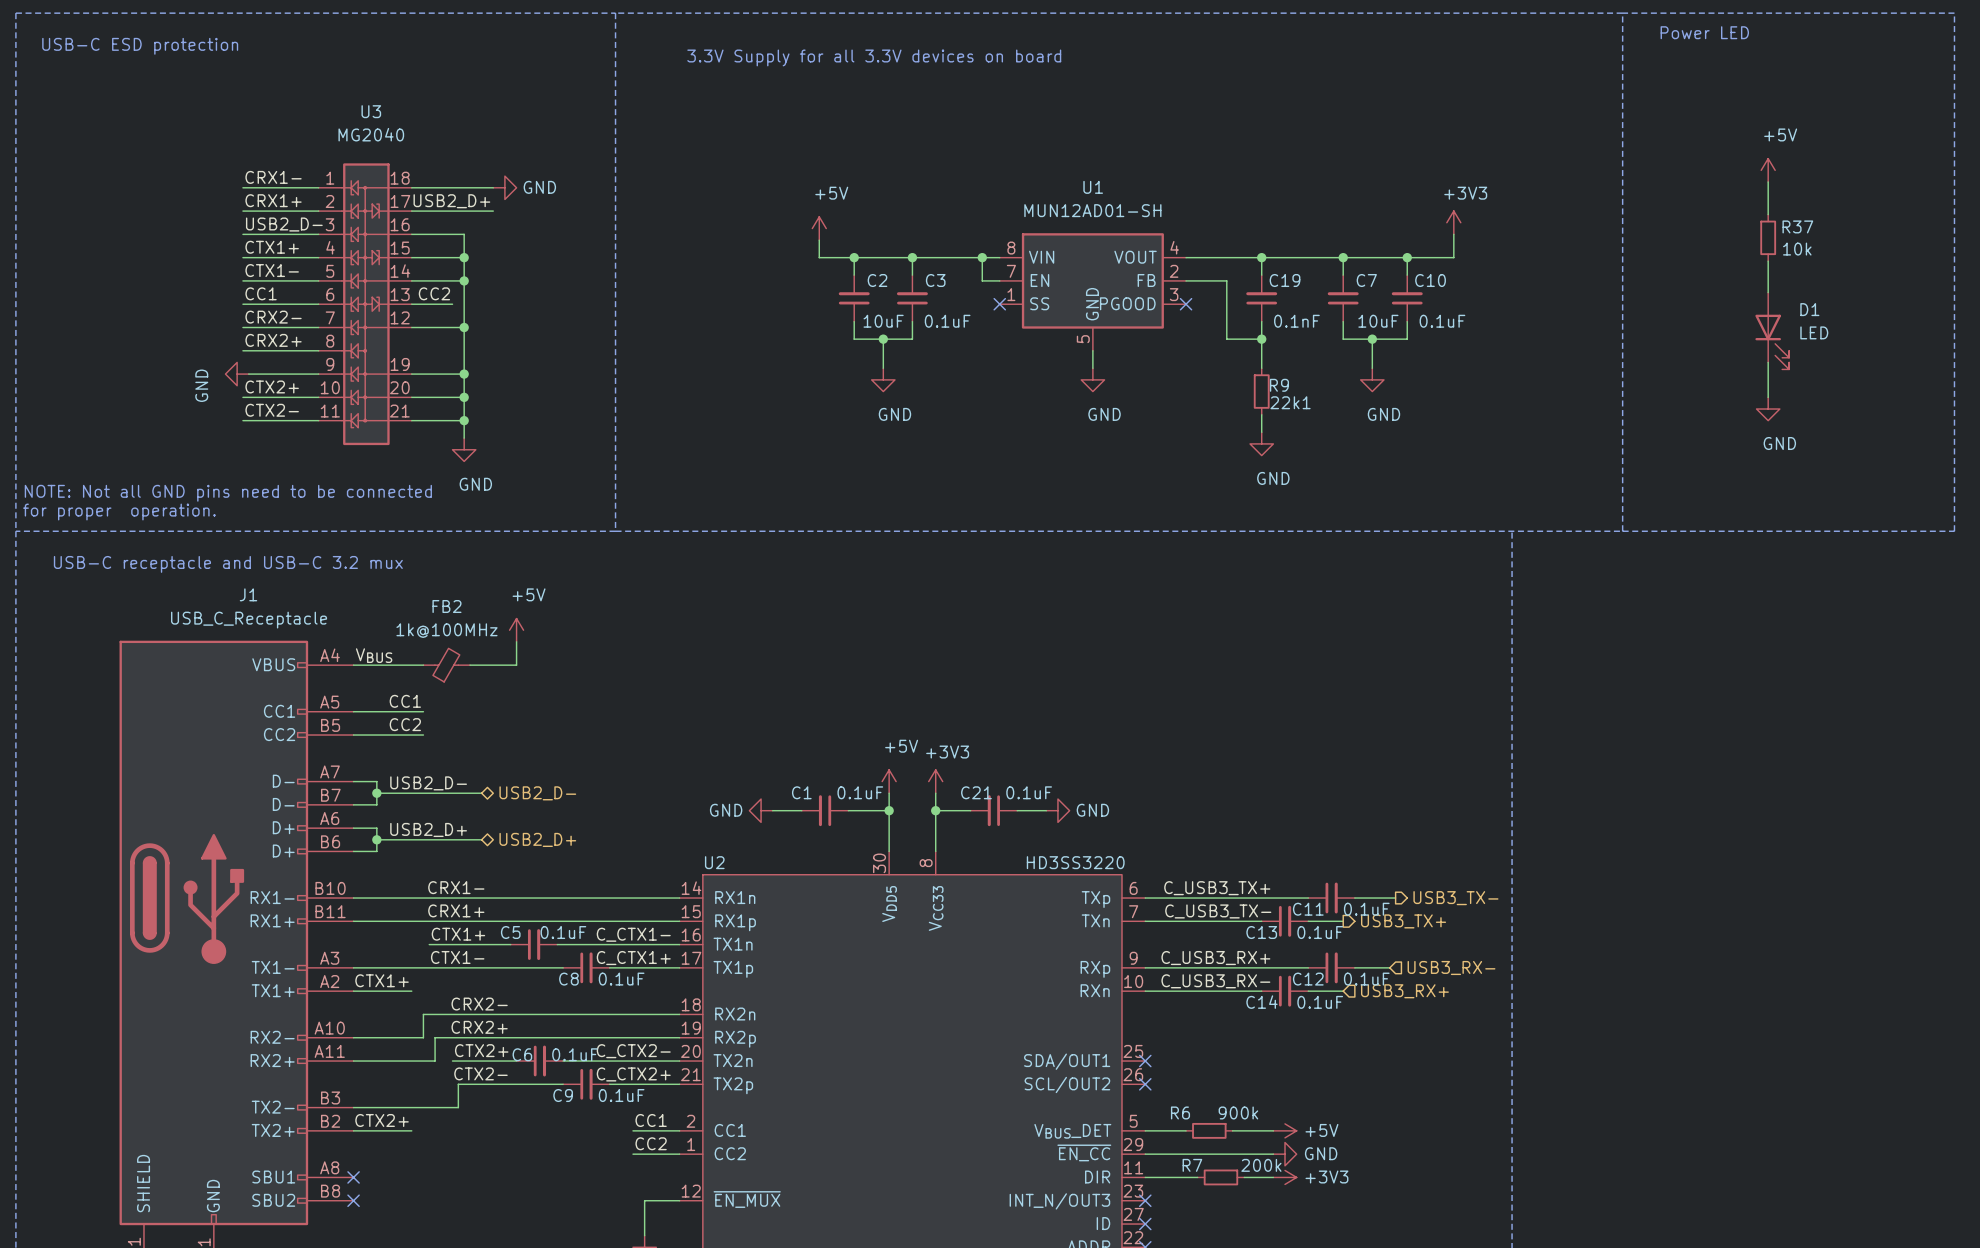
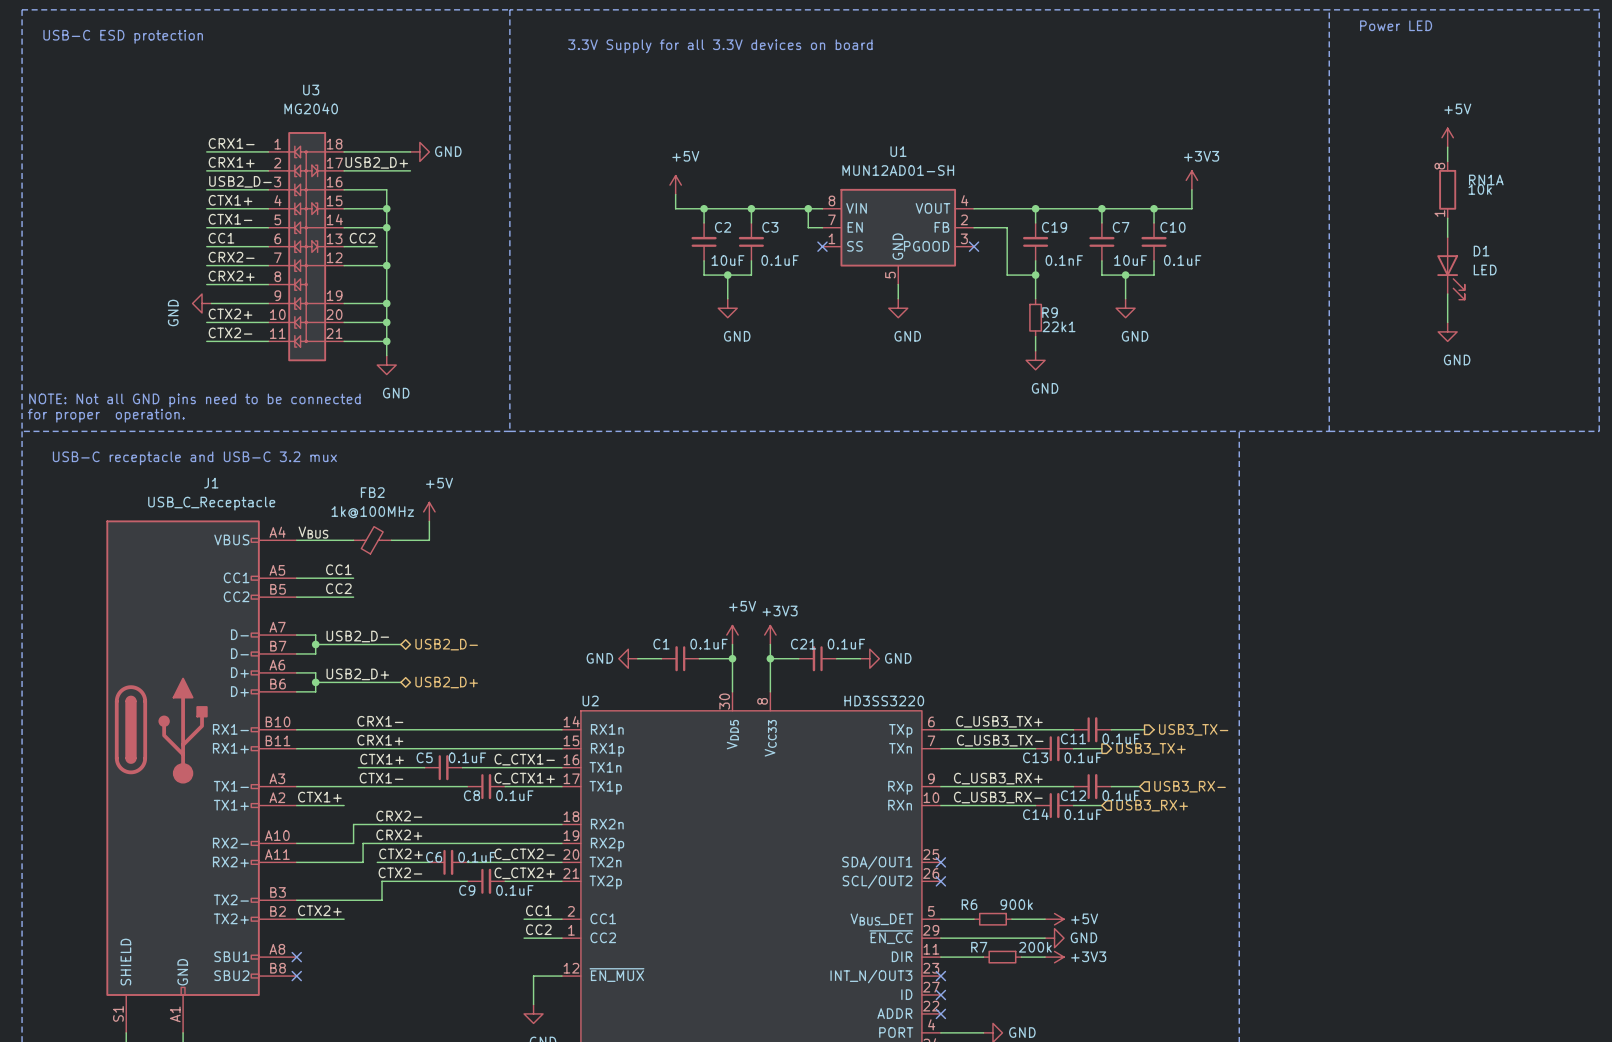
RN1A: none -> 10k (1447, 189)
R37: 10k (1768, 237) -> none

